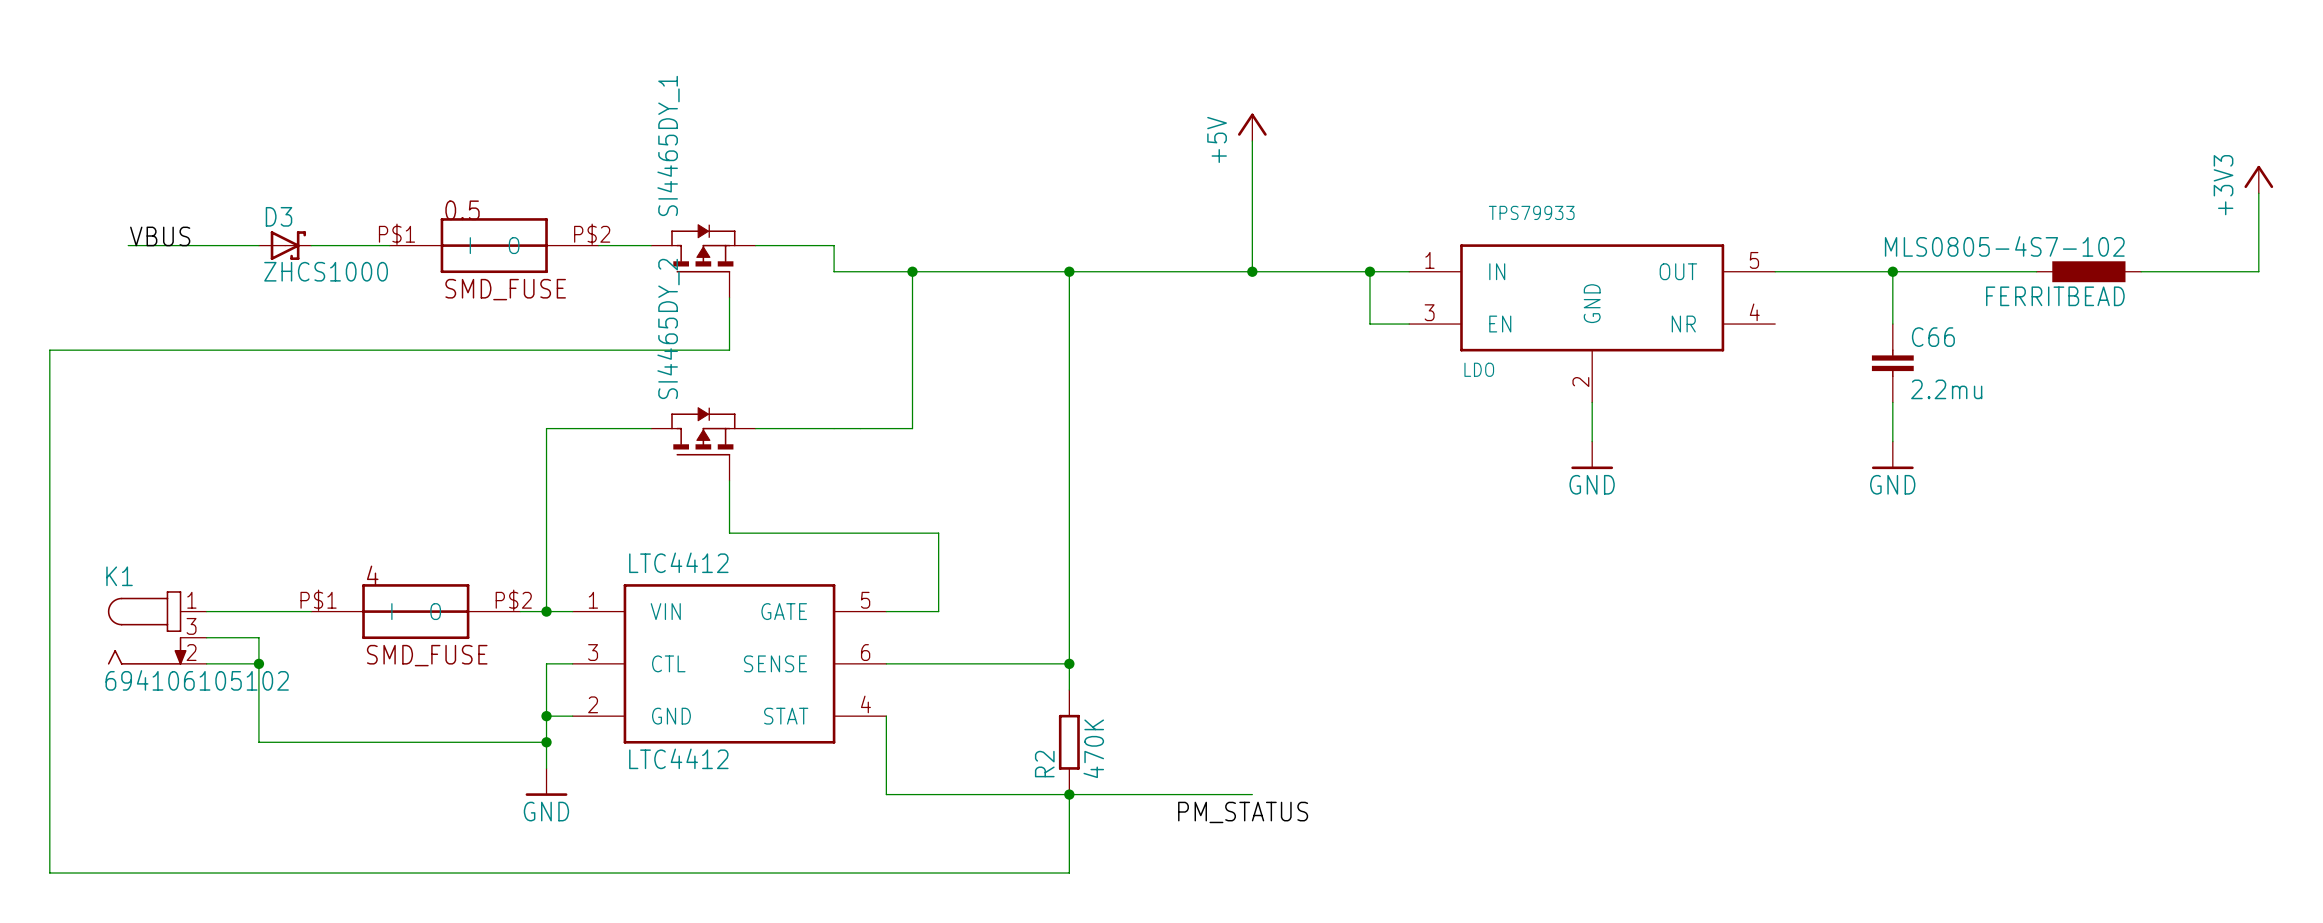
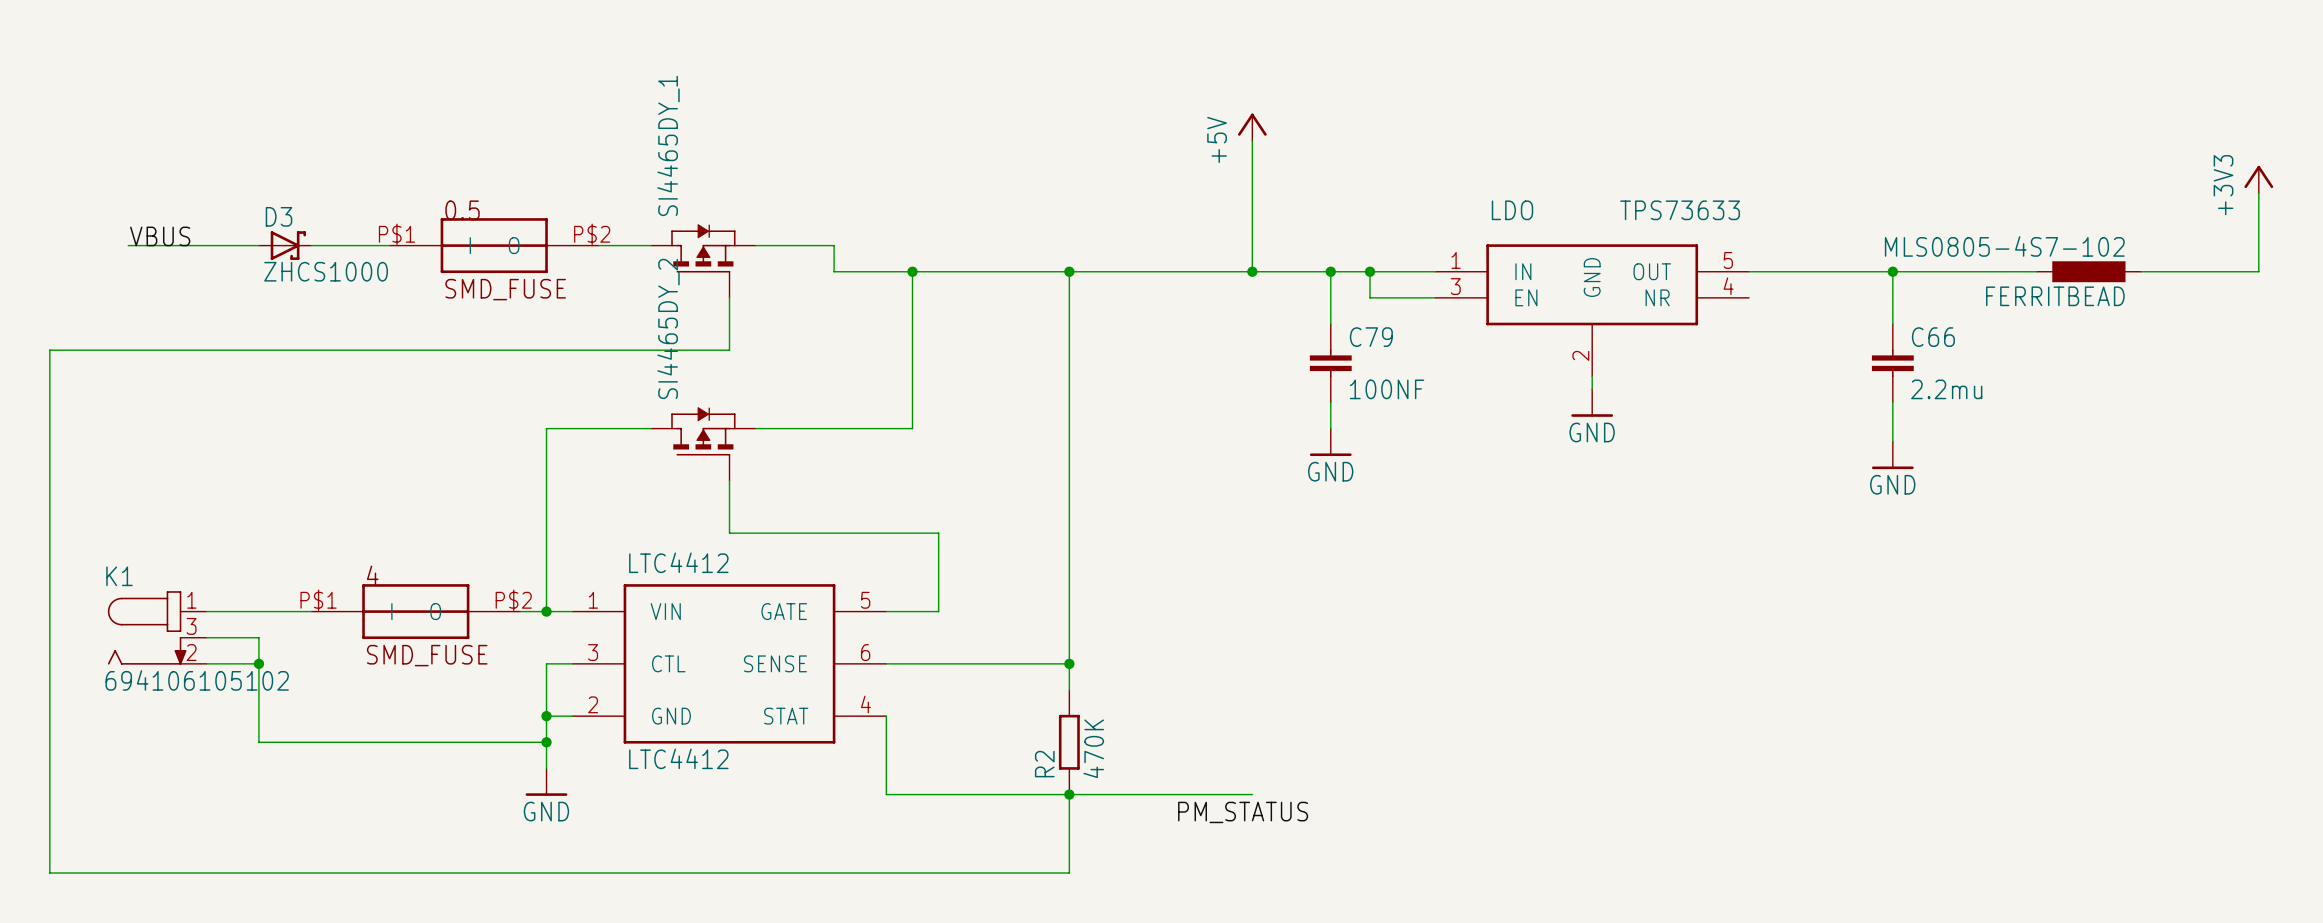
wire: none -> (1330, 271) (1330, 324)
junction: none -> (1330, 271)
wire: (1369, 297) (1369, 324) (1409, 324) -> (1369, 297) (1435, 297)
LDO: none -> TPS73633 (1592, 310)
LDO: TPS79933 (1592, 323) -> none
C79: none -> 100NF (1330, 363)
wire: none -> (1330, 402) (1330, 428)
wire: (1592, 402) (1592, 441) -> none
power symbol: none -> GND (1330, 442)
power symbol position: GND (1592, 455) -> GND (1592, 403)

